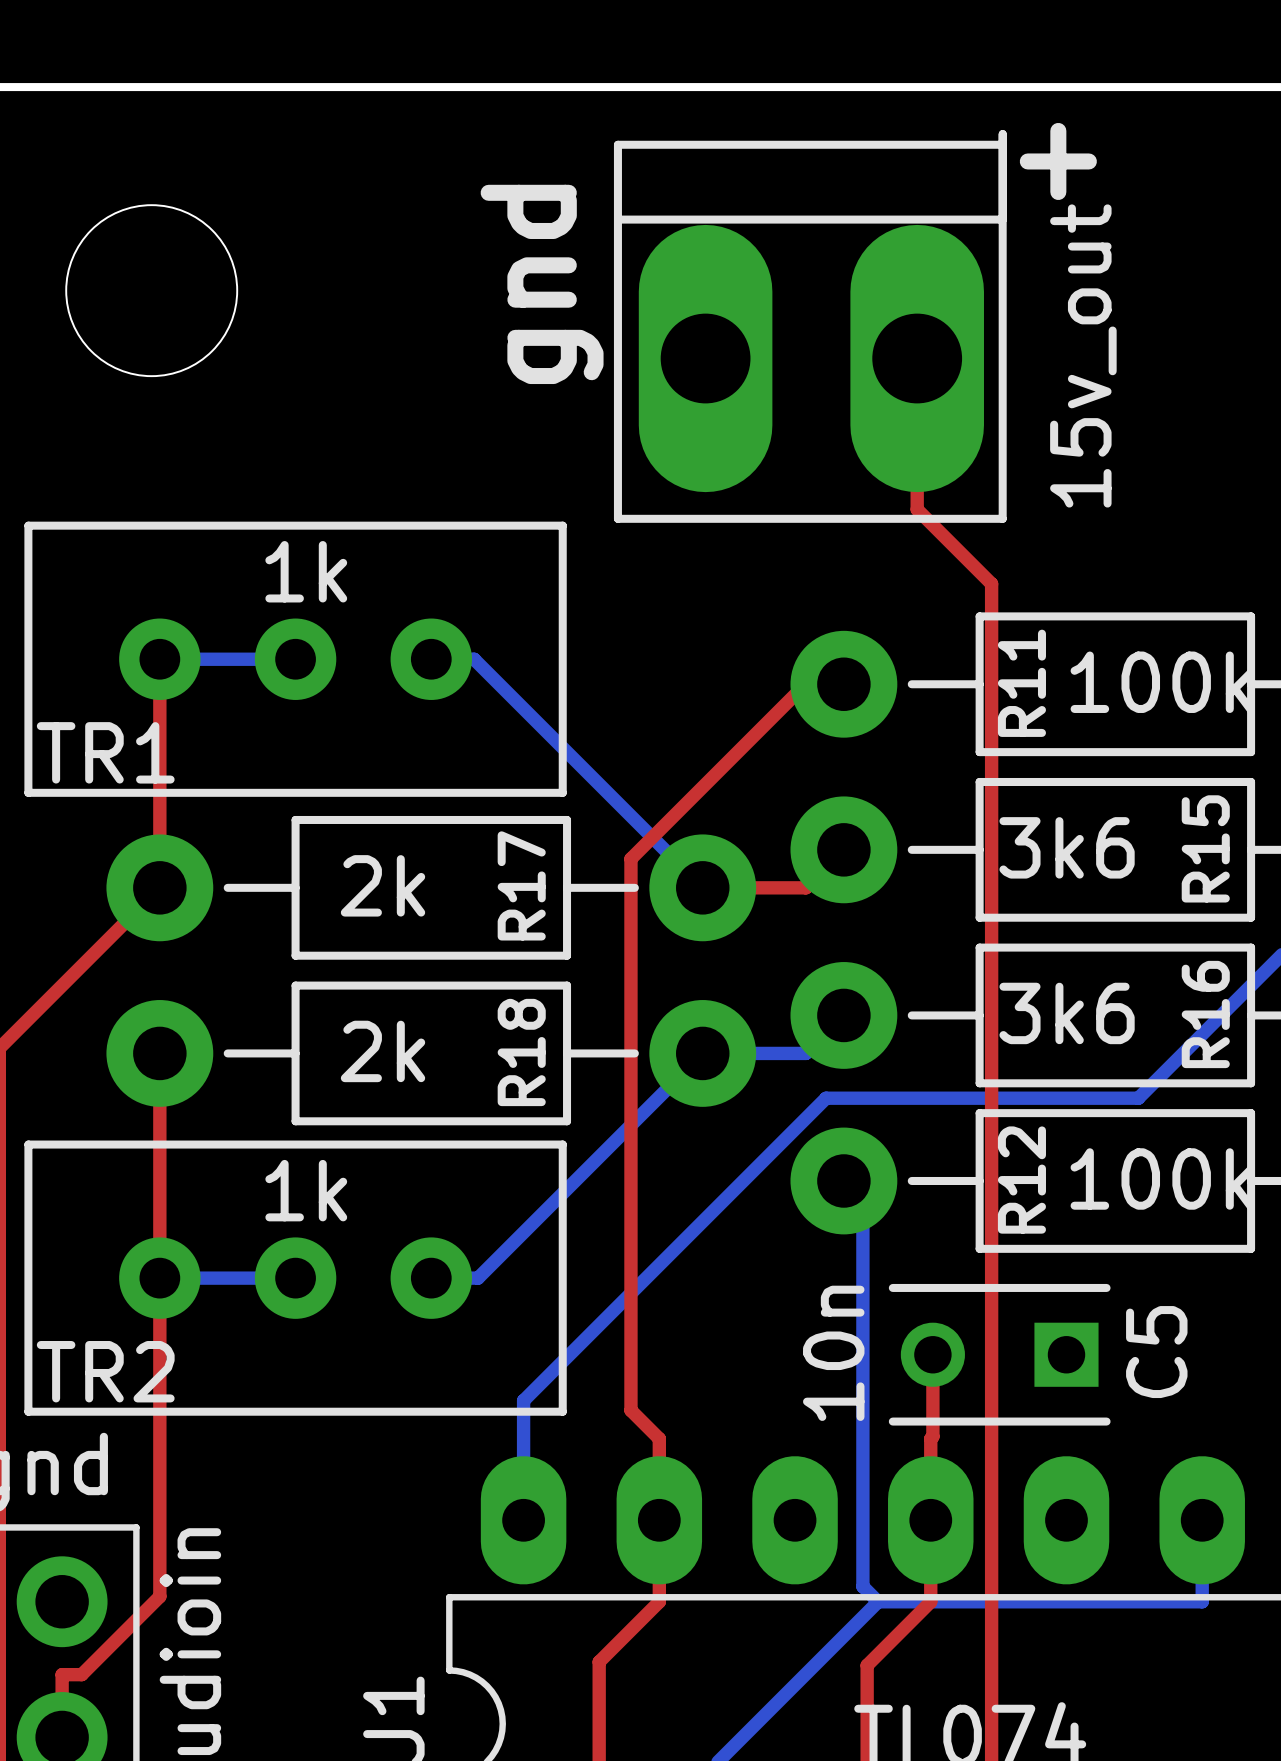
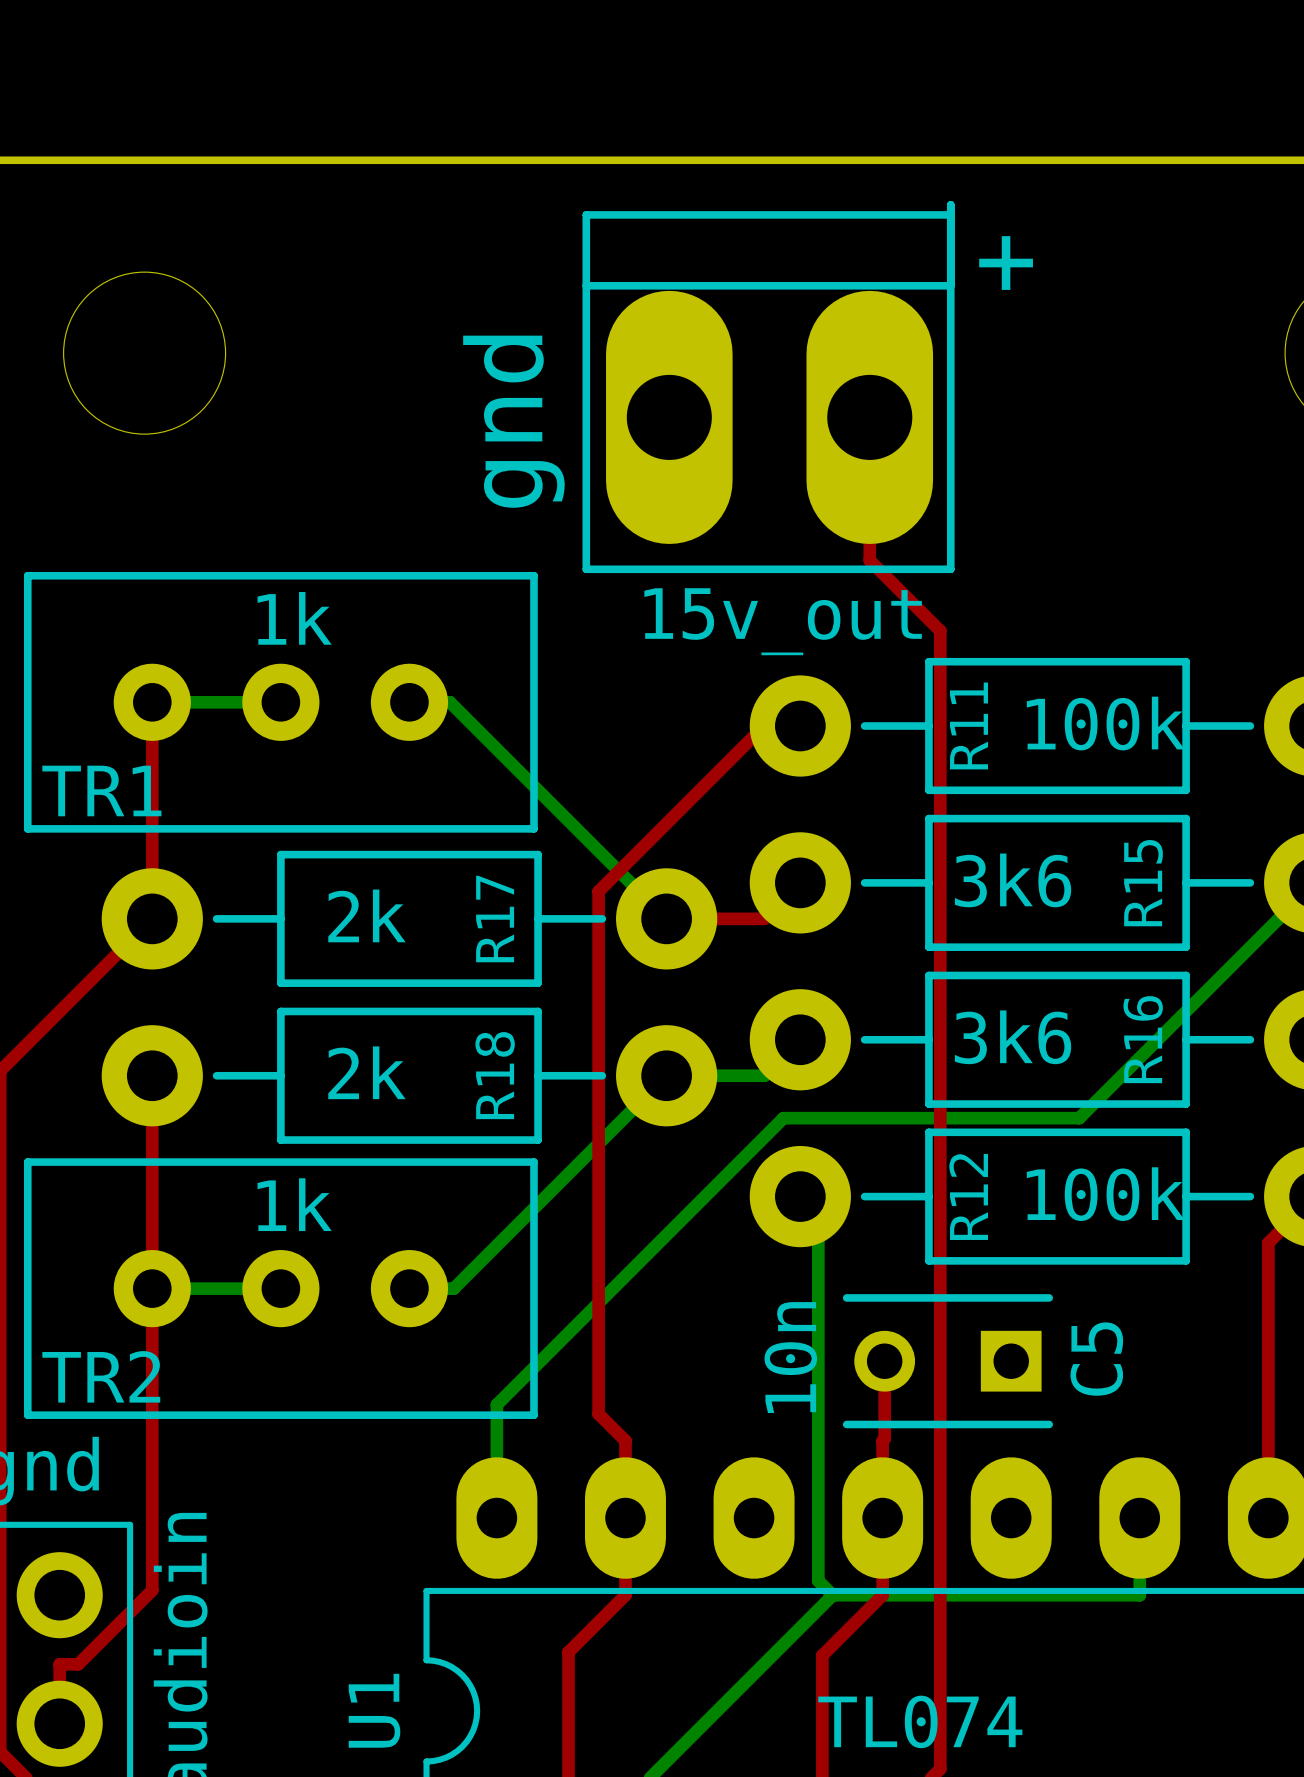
text position: + (1058, 161) -> + (1006, 263)
text position: gnd (542, 284) -> gnd (513, 421)
part value rotation: 0° (1083, 355) -> 90° clockwise (783, 621)

